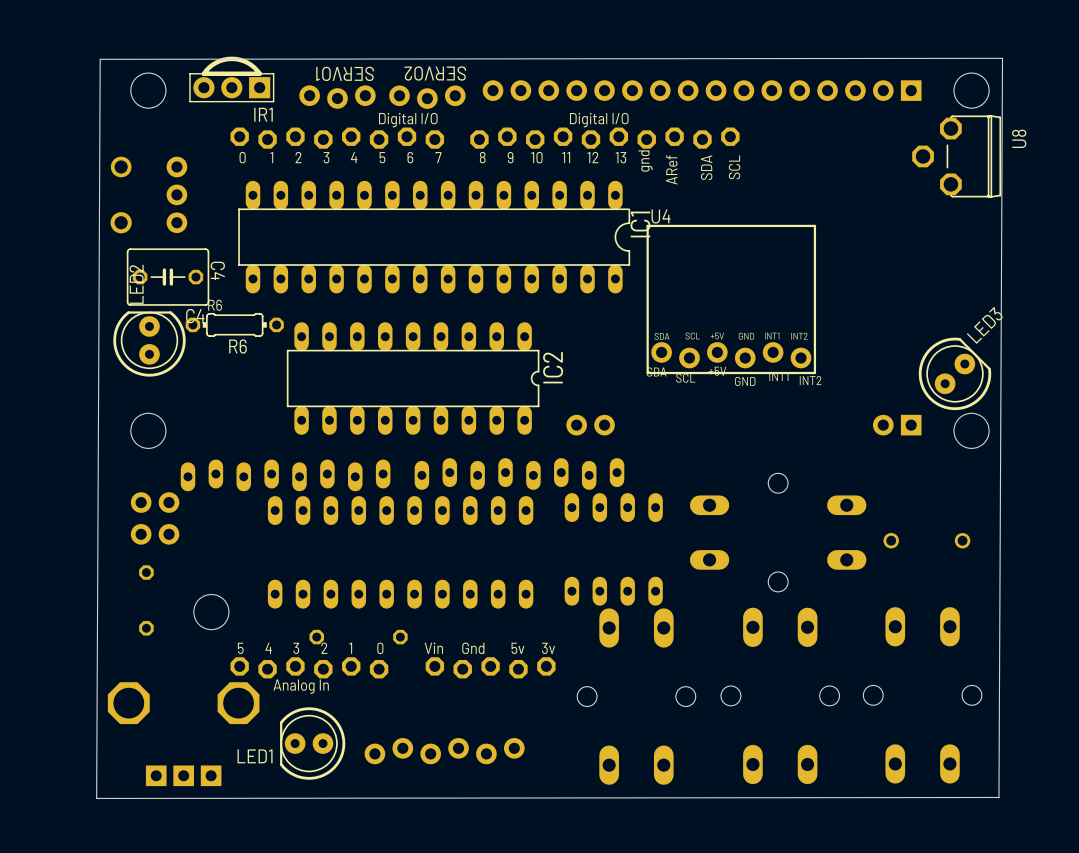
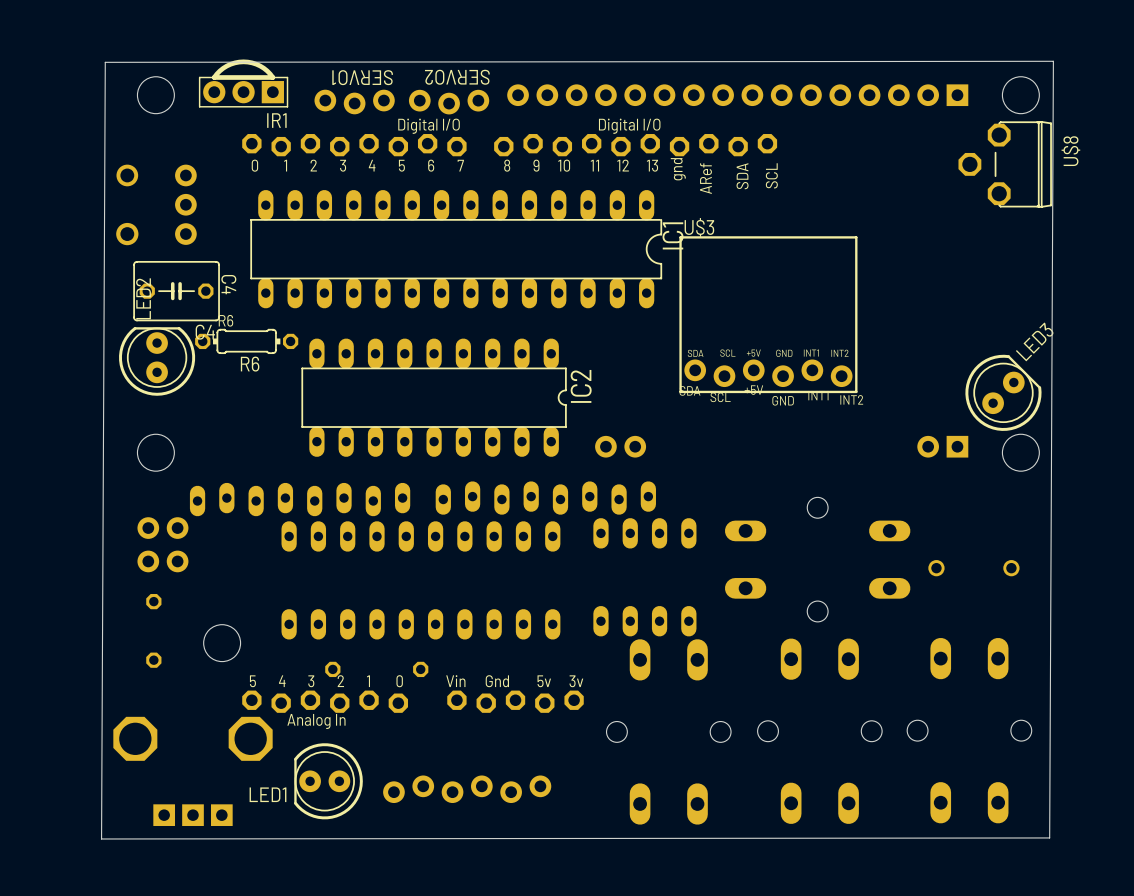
U8 name: U8 (1019, 138) -> U$8 (1070, 151)
U4 name: U4 (660, 216) -> U$3 (699, 227)

